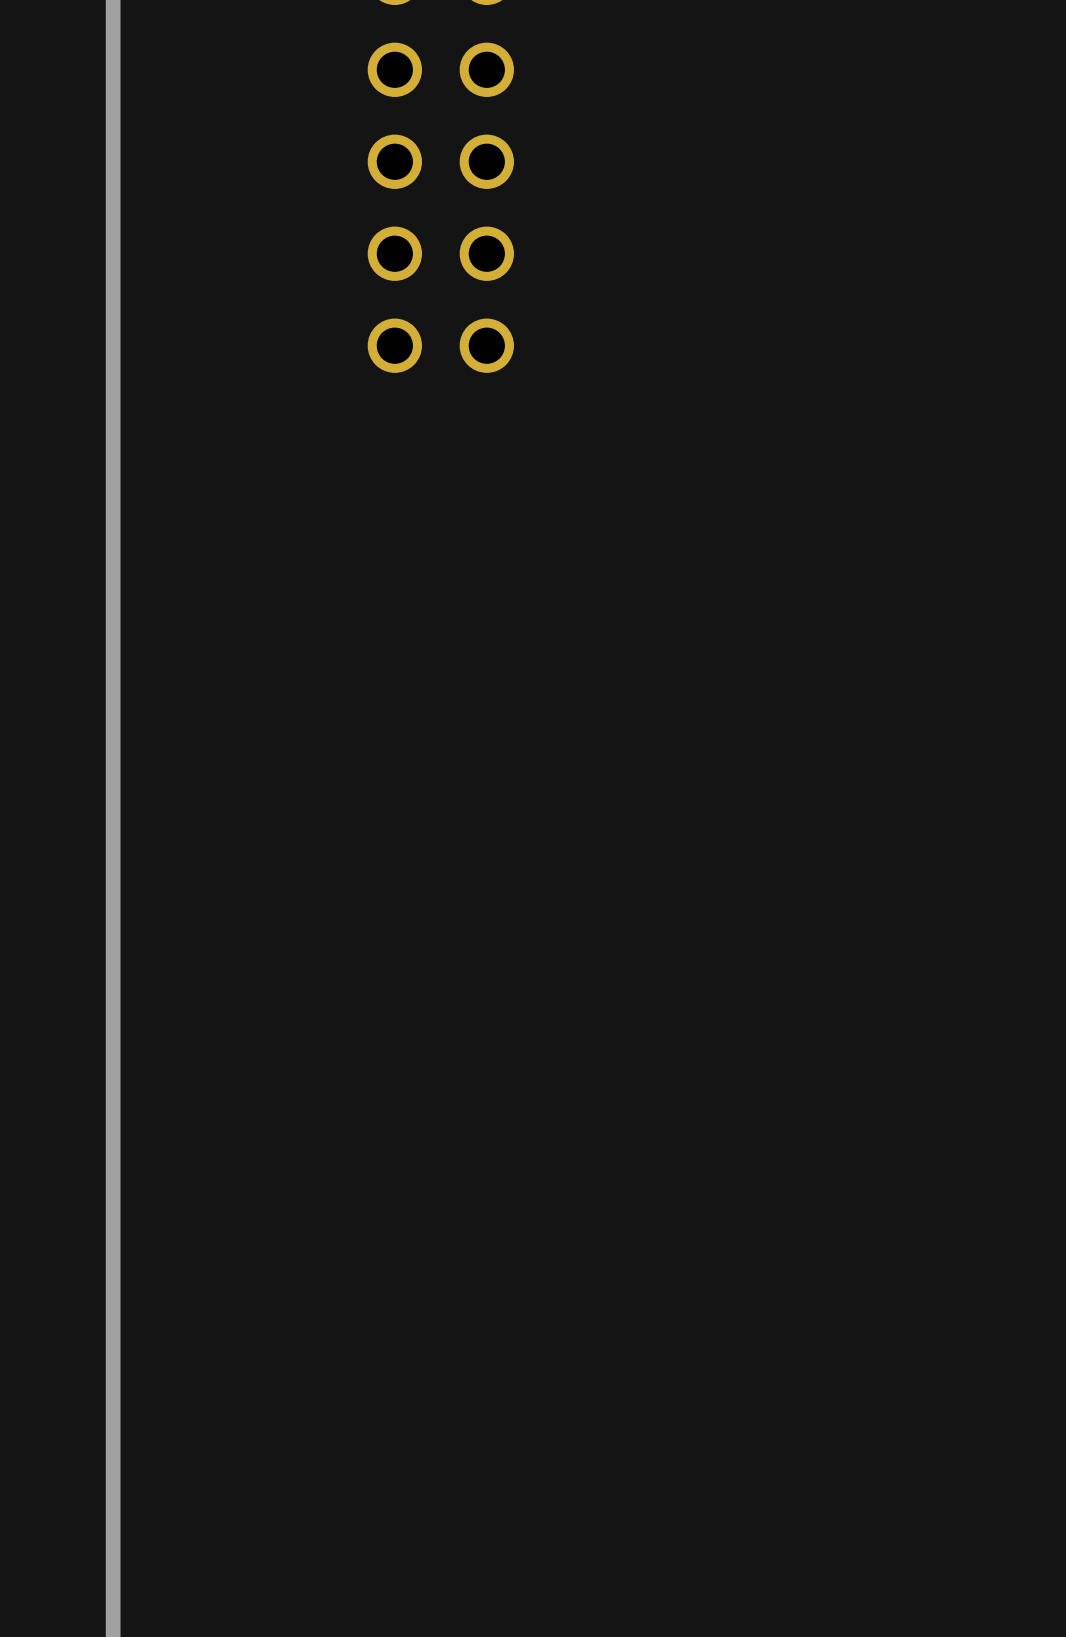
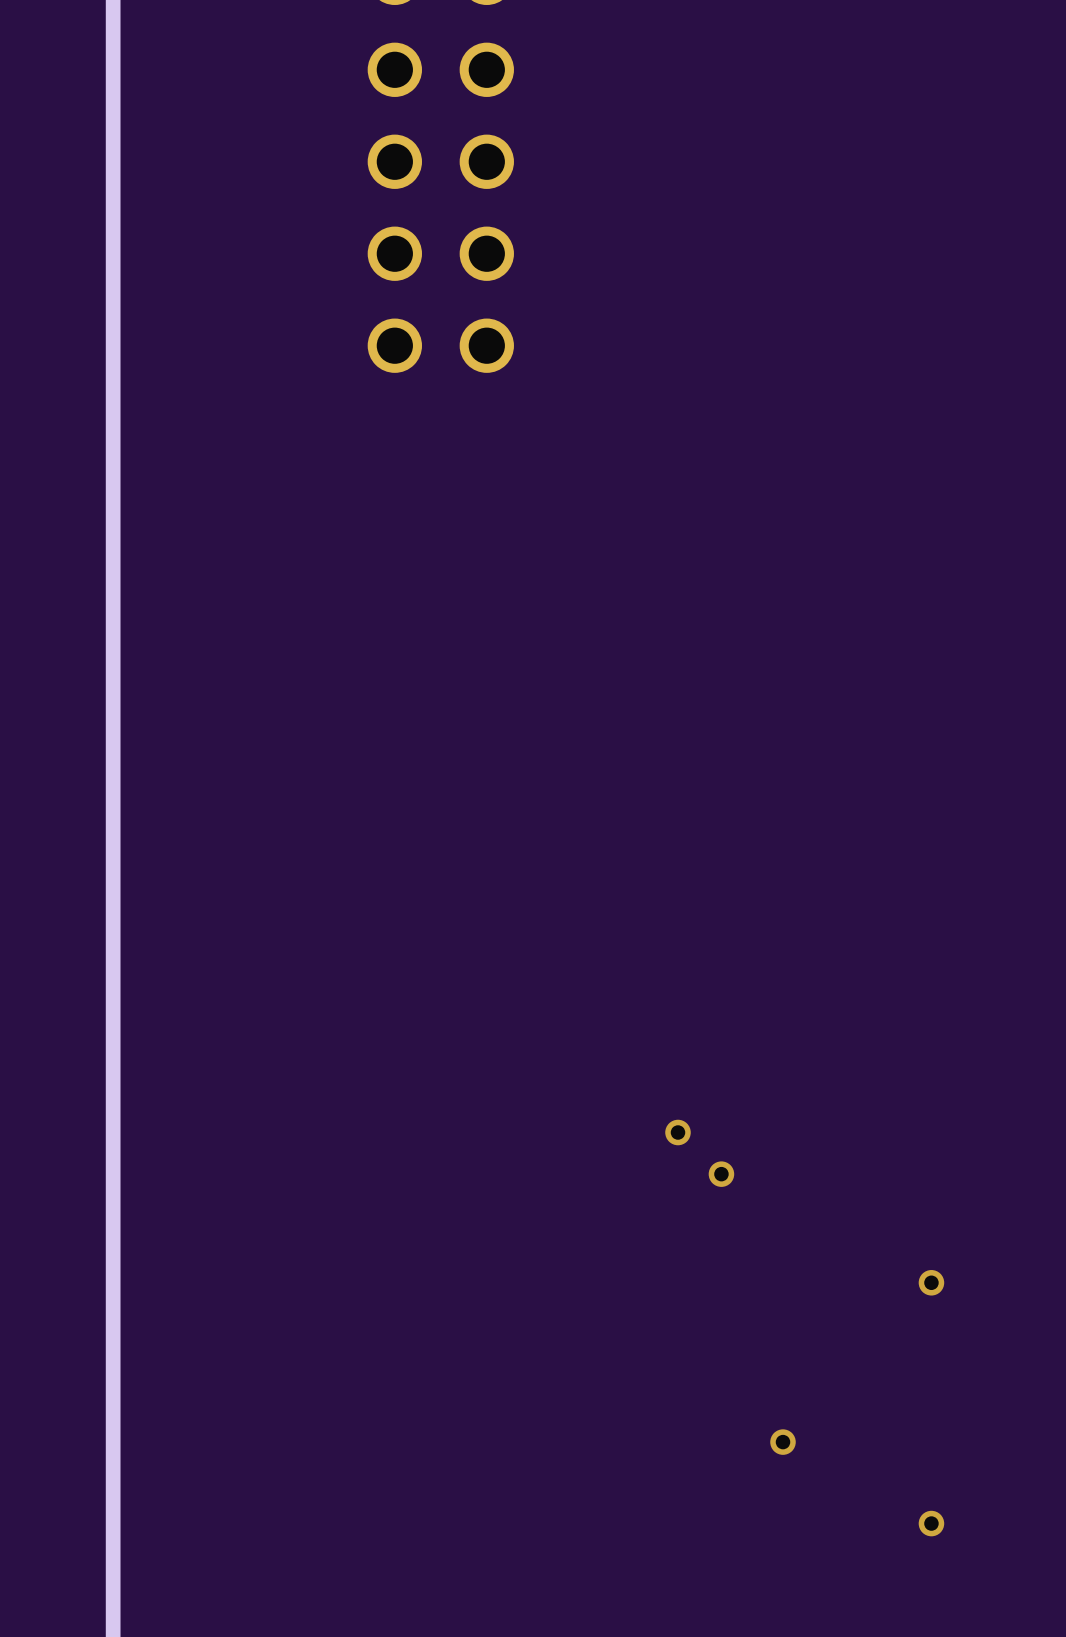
via: none -> (677, 1132)
via: none -> (721, 1174)
via: none -> (931, 1282)
via: none -> (783, 1442)
via: none -> (931, 1523)

